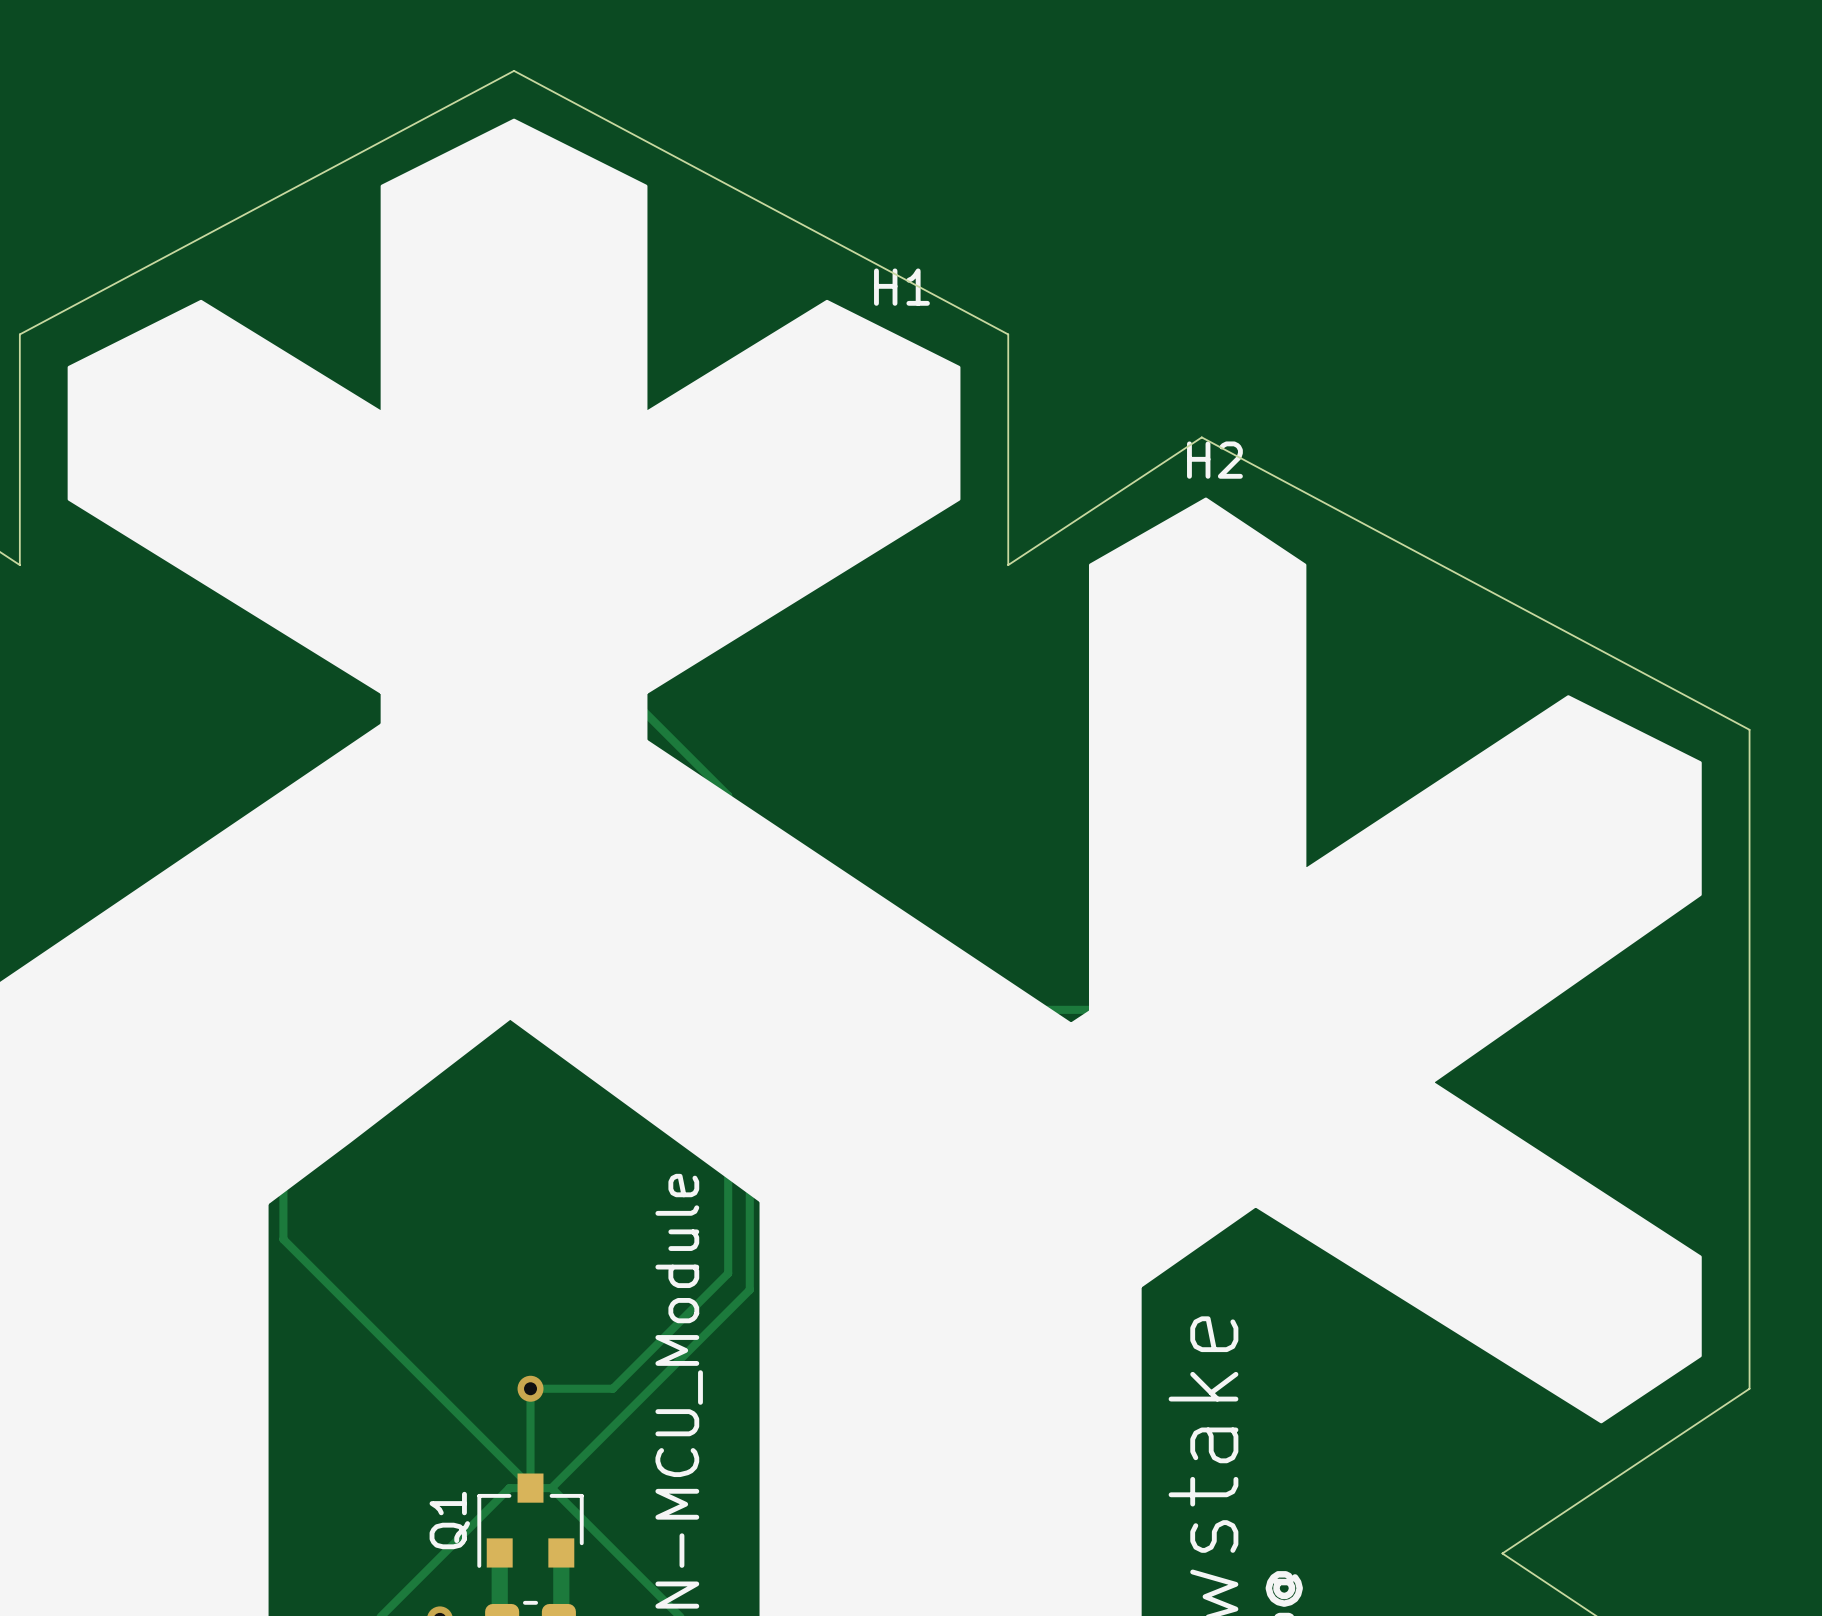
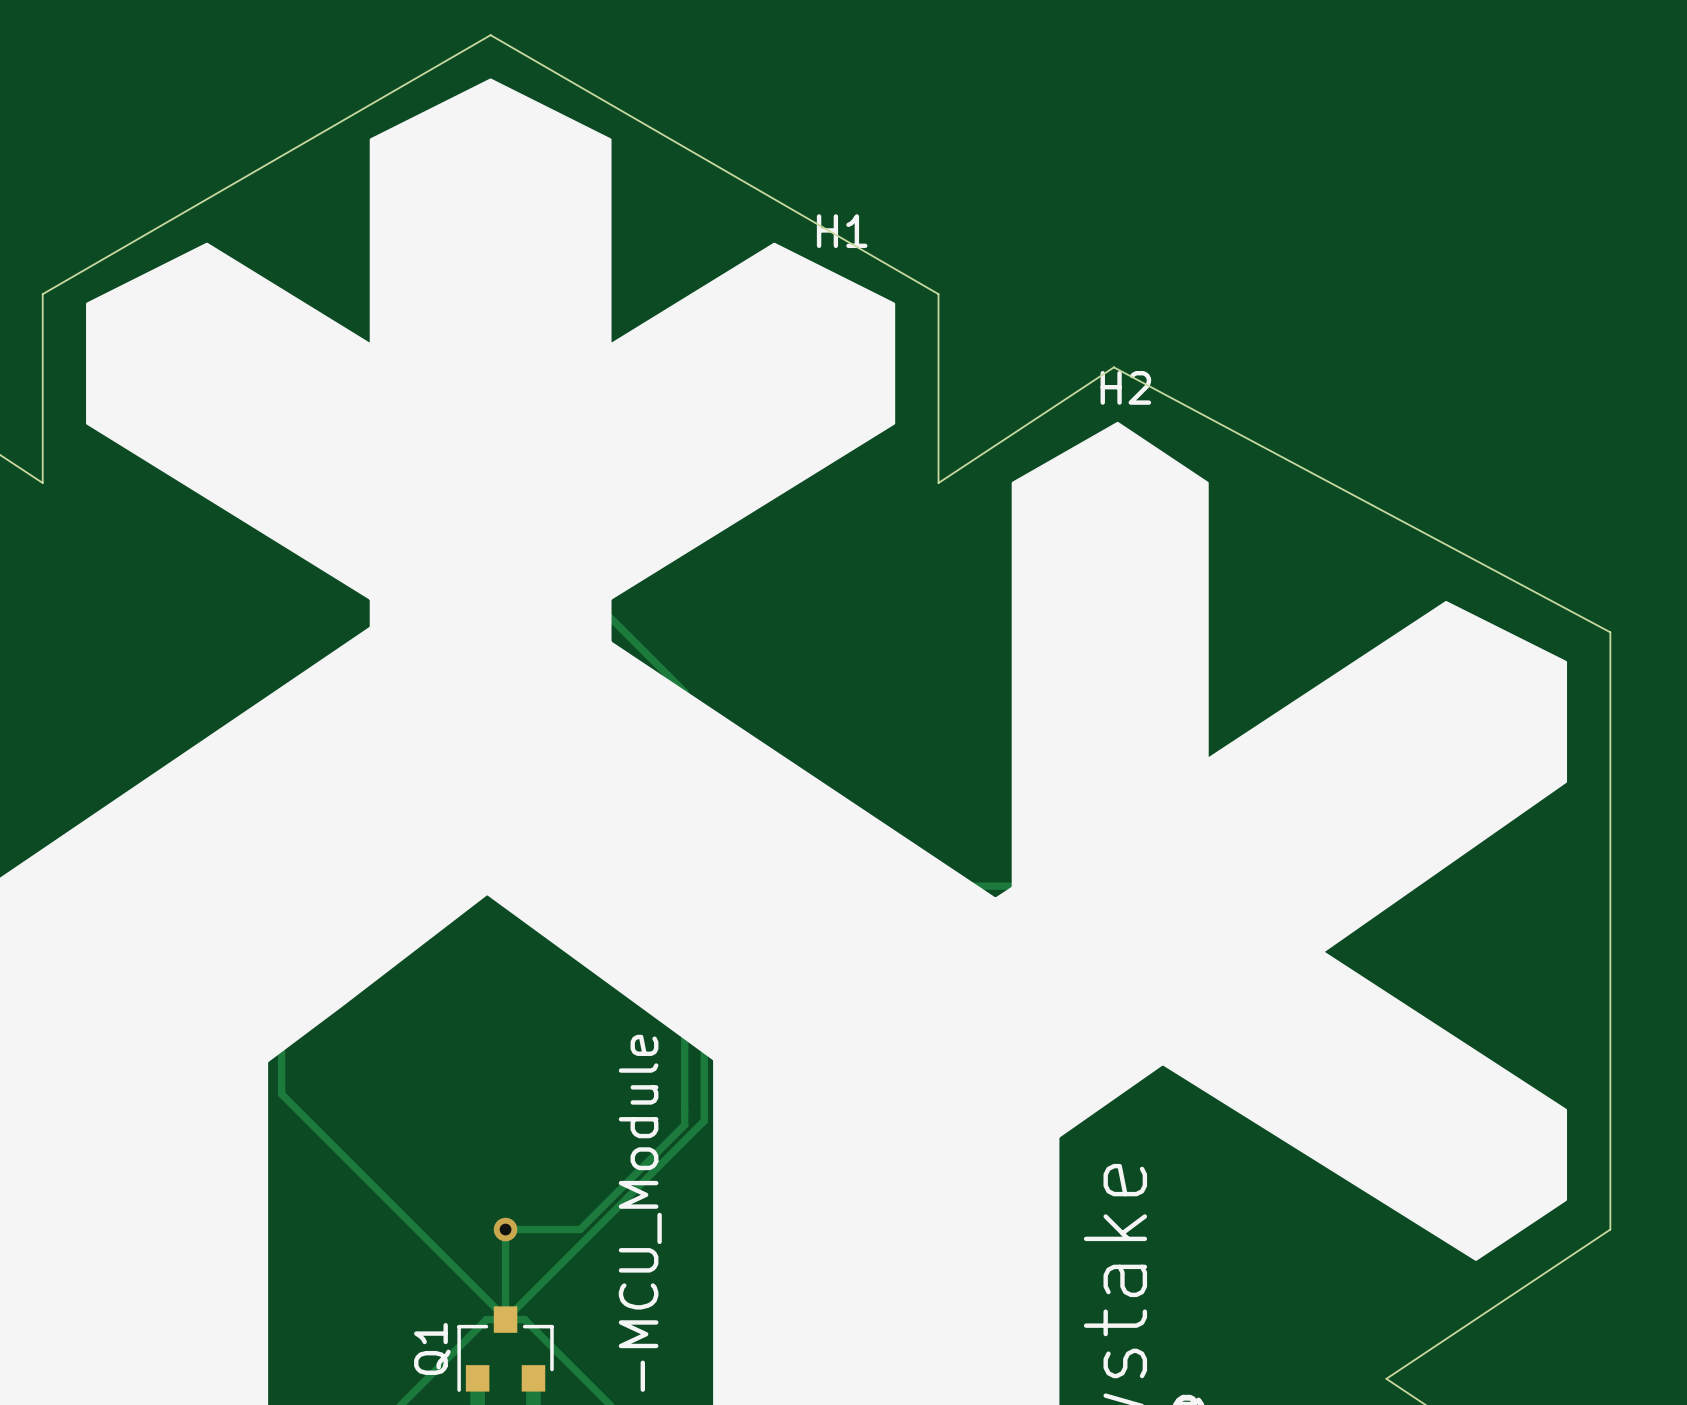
board edge: (19, 356) (19, 334) (514, 70) (1008, 334) (1008, 356) -> (42, 294) (490, 35) (938, 294)
track: (749, 1268) (749, 1289) (551, 1488) -> (704, 1120) (505, 1319)

